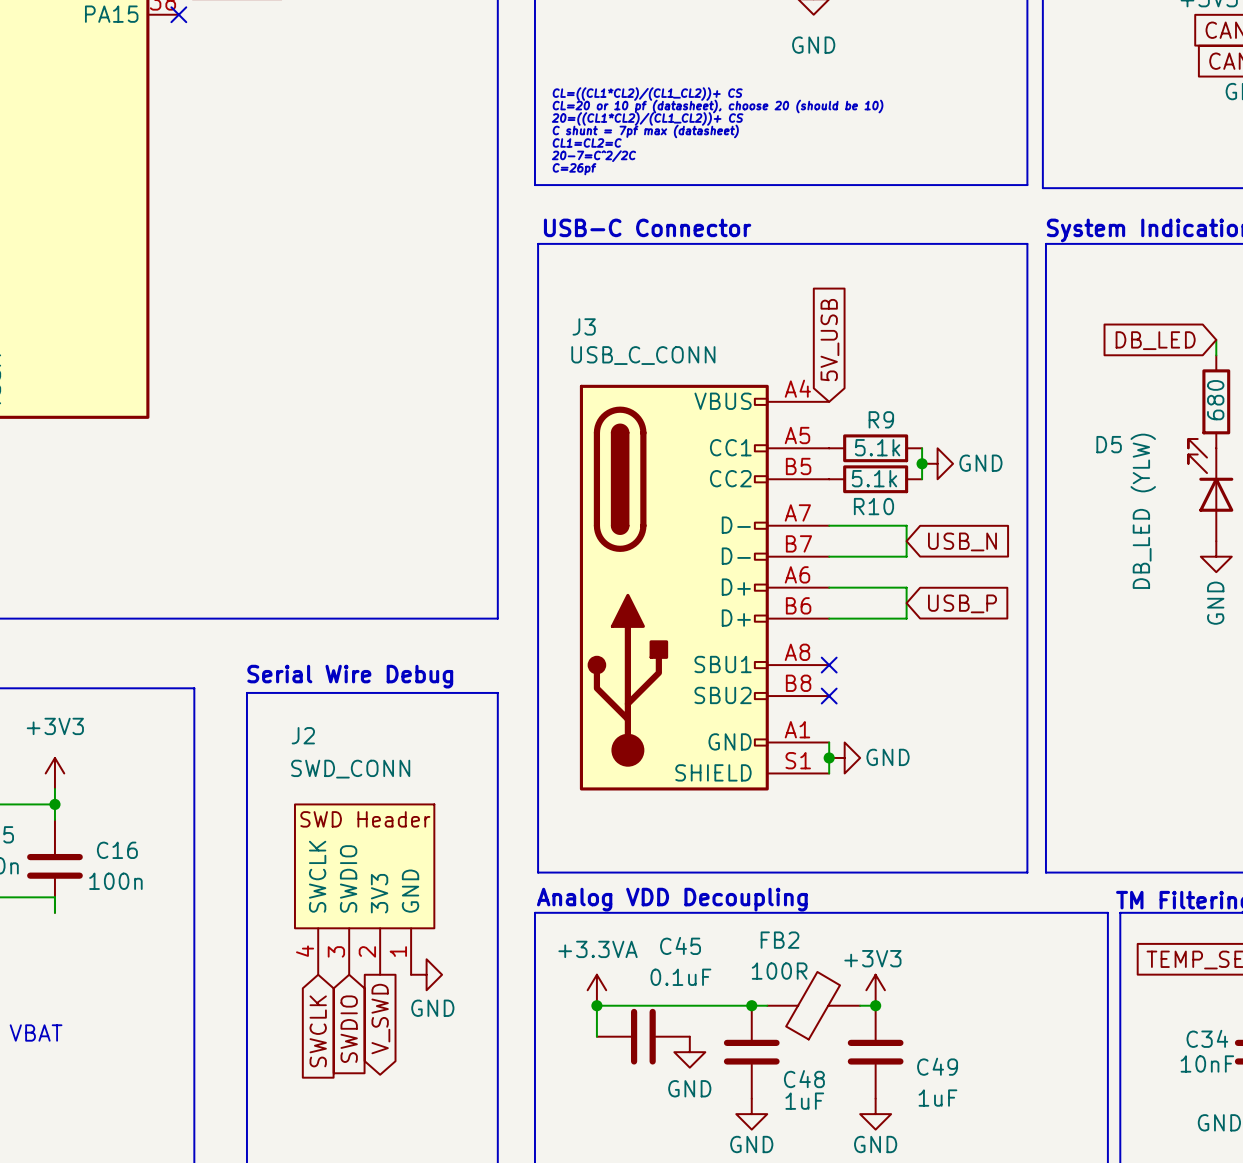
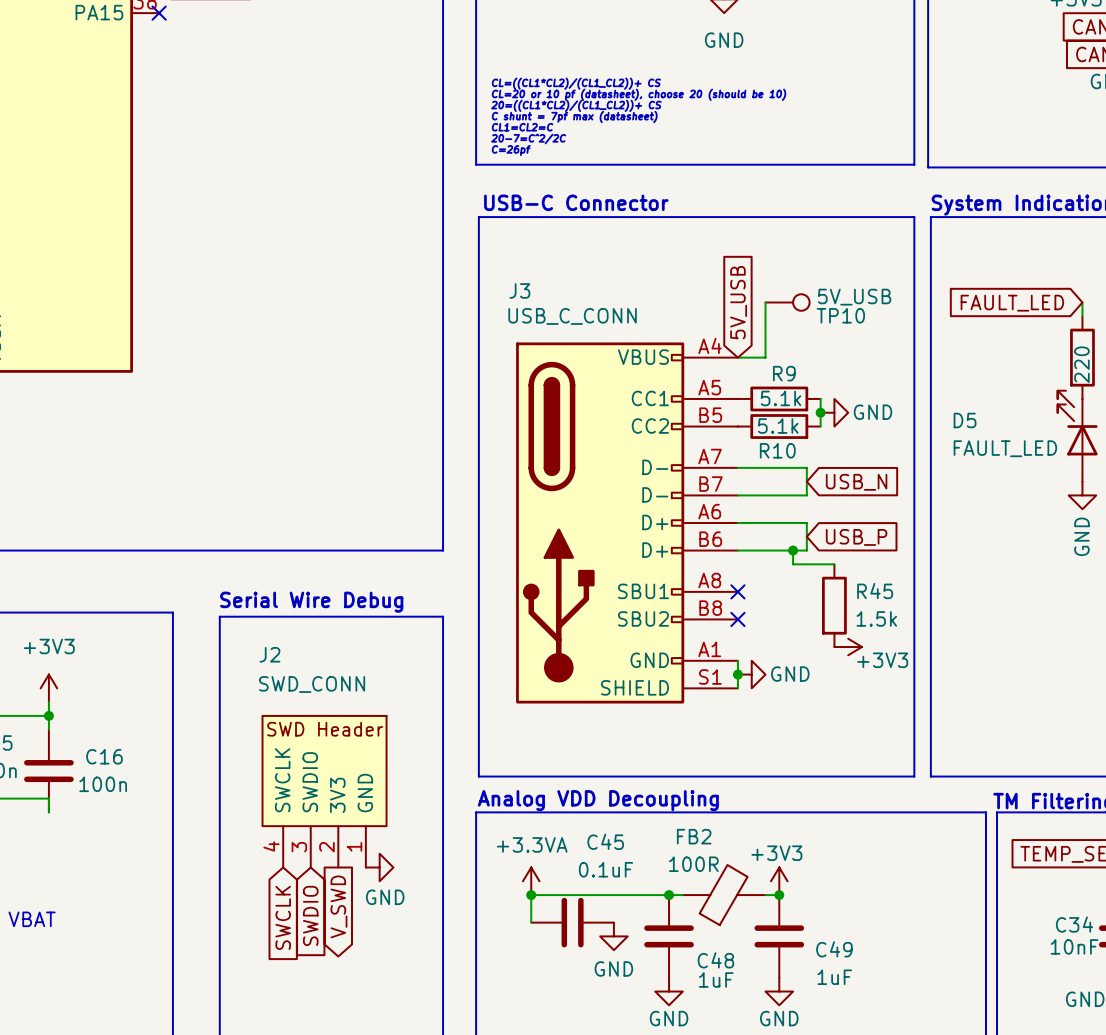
wire: none -> (765, 302) (765, 357) (737, 357)
TP10: none -> 5V_USB (787, 302)
global label: DB_LED (1155, 340) -> FAULT_LED (1012, 303)
part value: 680 (1215, 400) -> 220 (1081, 364)
D5 name position: D5 (1109, 444) -> D5 (965, 420)
D5 value: DB_LED (YLW) (1143, 511) -> FAULT_LED (1005, 448)
wire: none -> (793, 550) (793, 564) (834, 564)
junction: none -> (793, 550)
R45: none -> 1.5k (834, 605)
power symbol: none -> +3V3 (848, 647)

